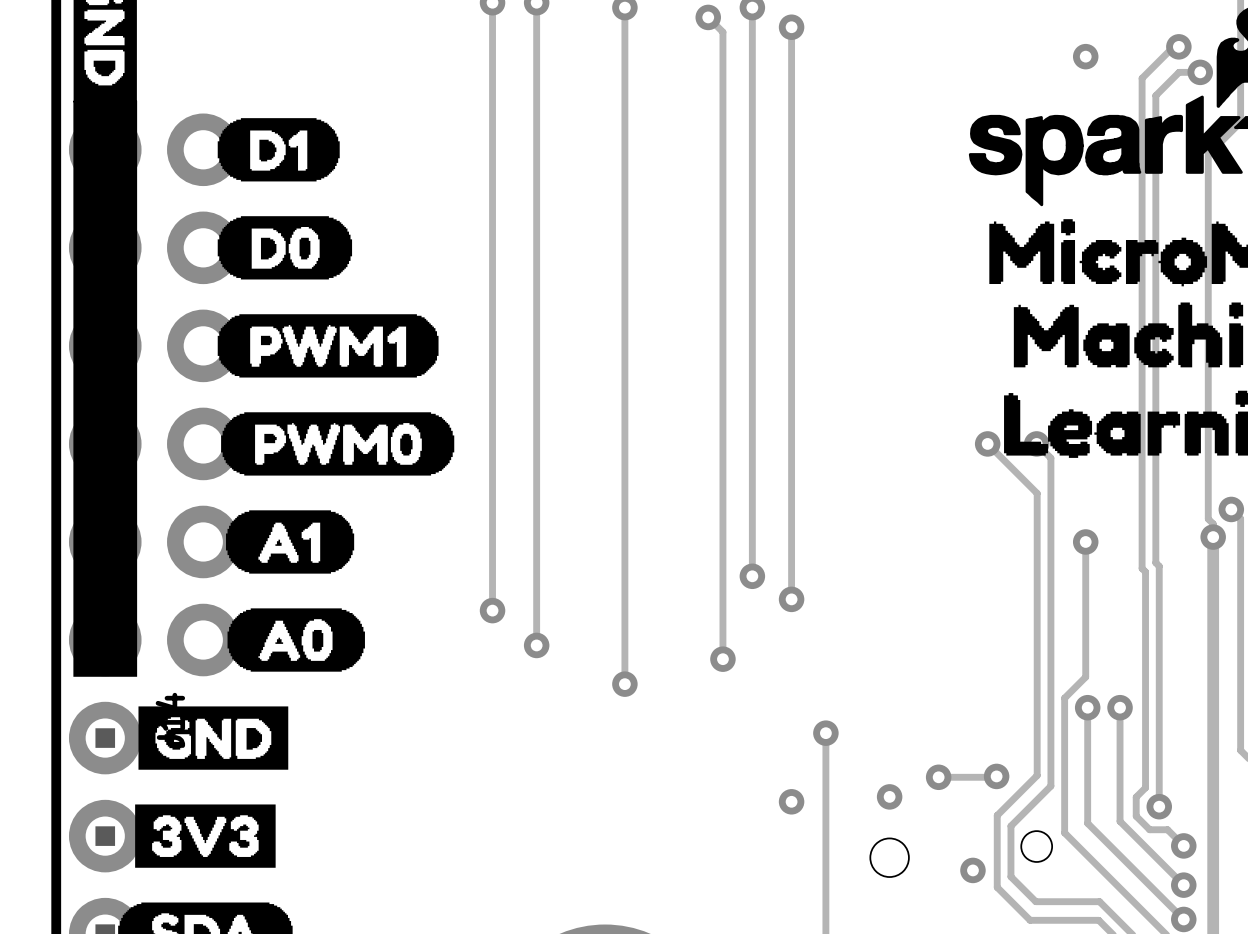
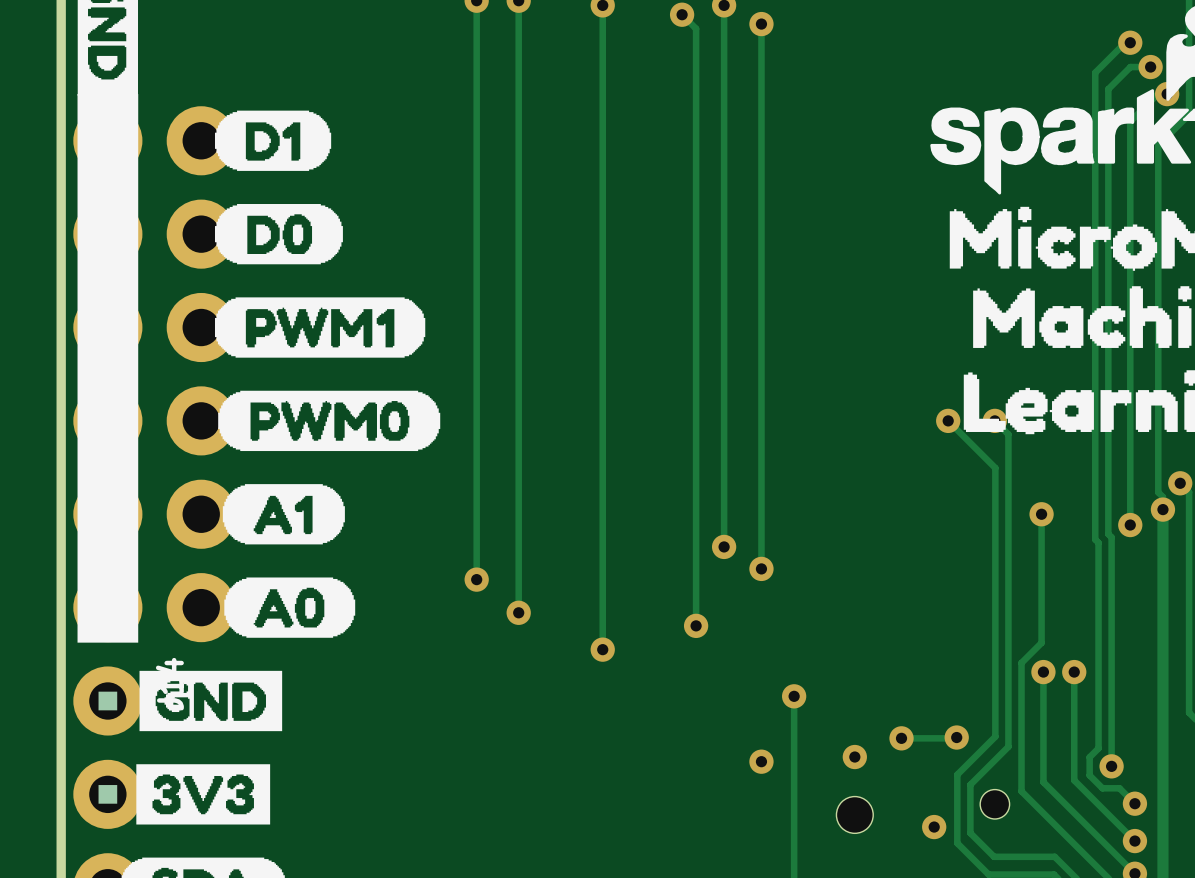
via position: (1085, 56) -> (1167, 94)
track: none -> (1167, 94) (1157, 94) (1130, 121) (1130, 525)
via: none -> (1130, 525)

